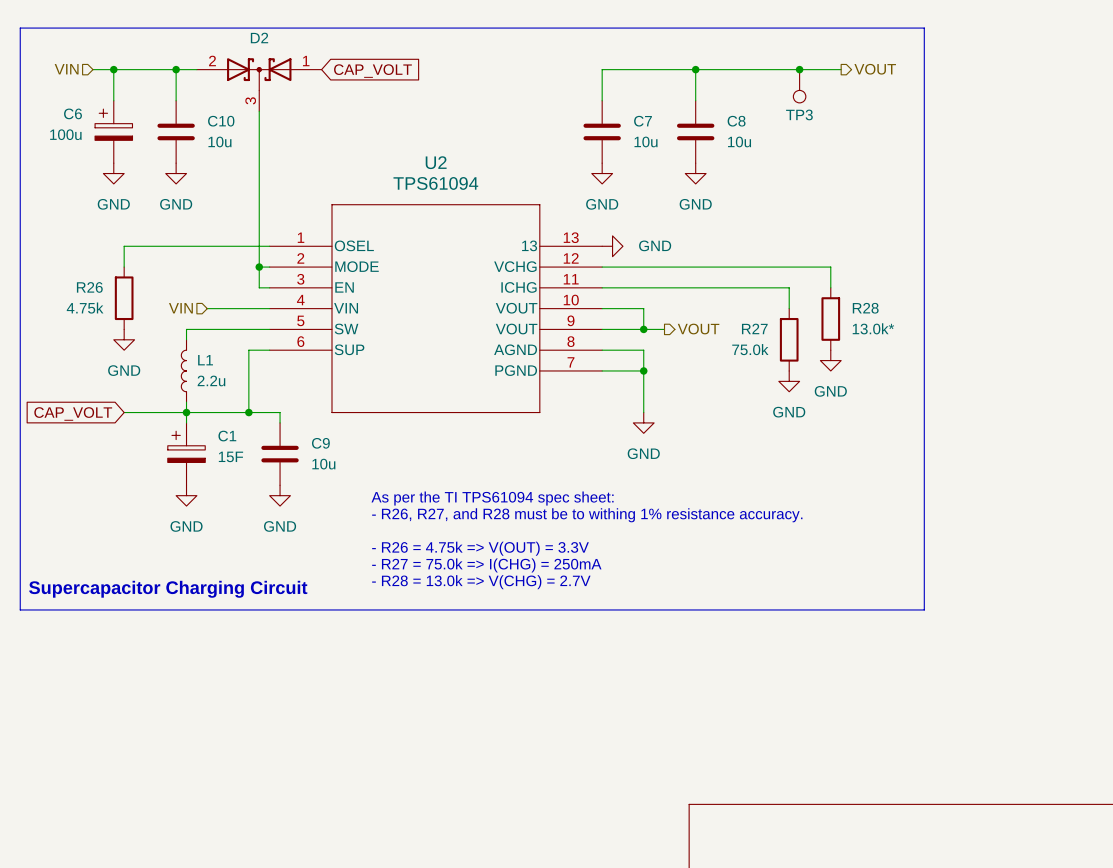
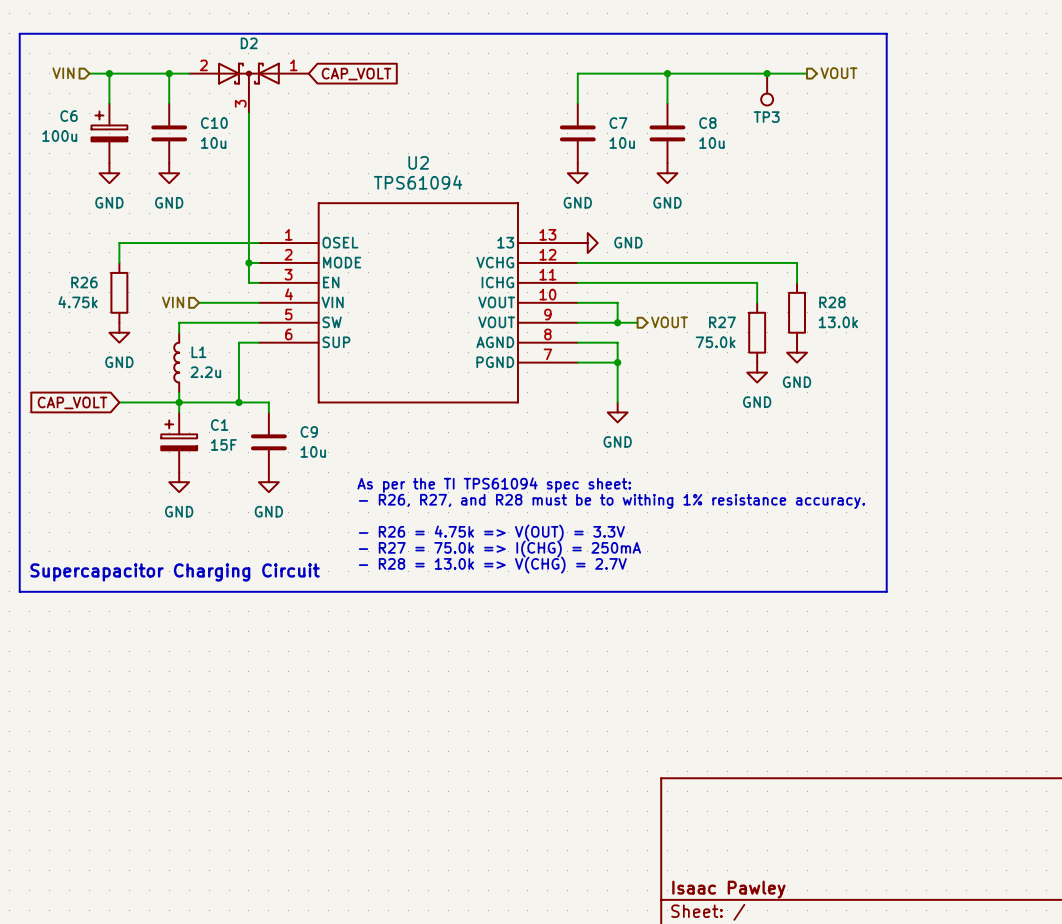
R28 value: 13.0k* (873, 328) -> 13.0k (838, 322)

